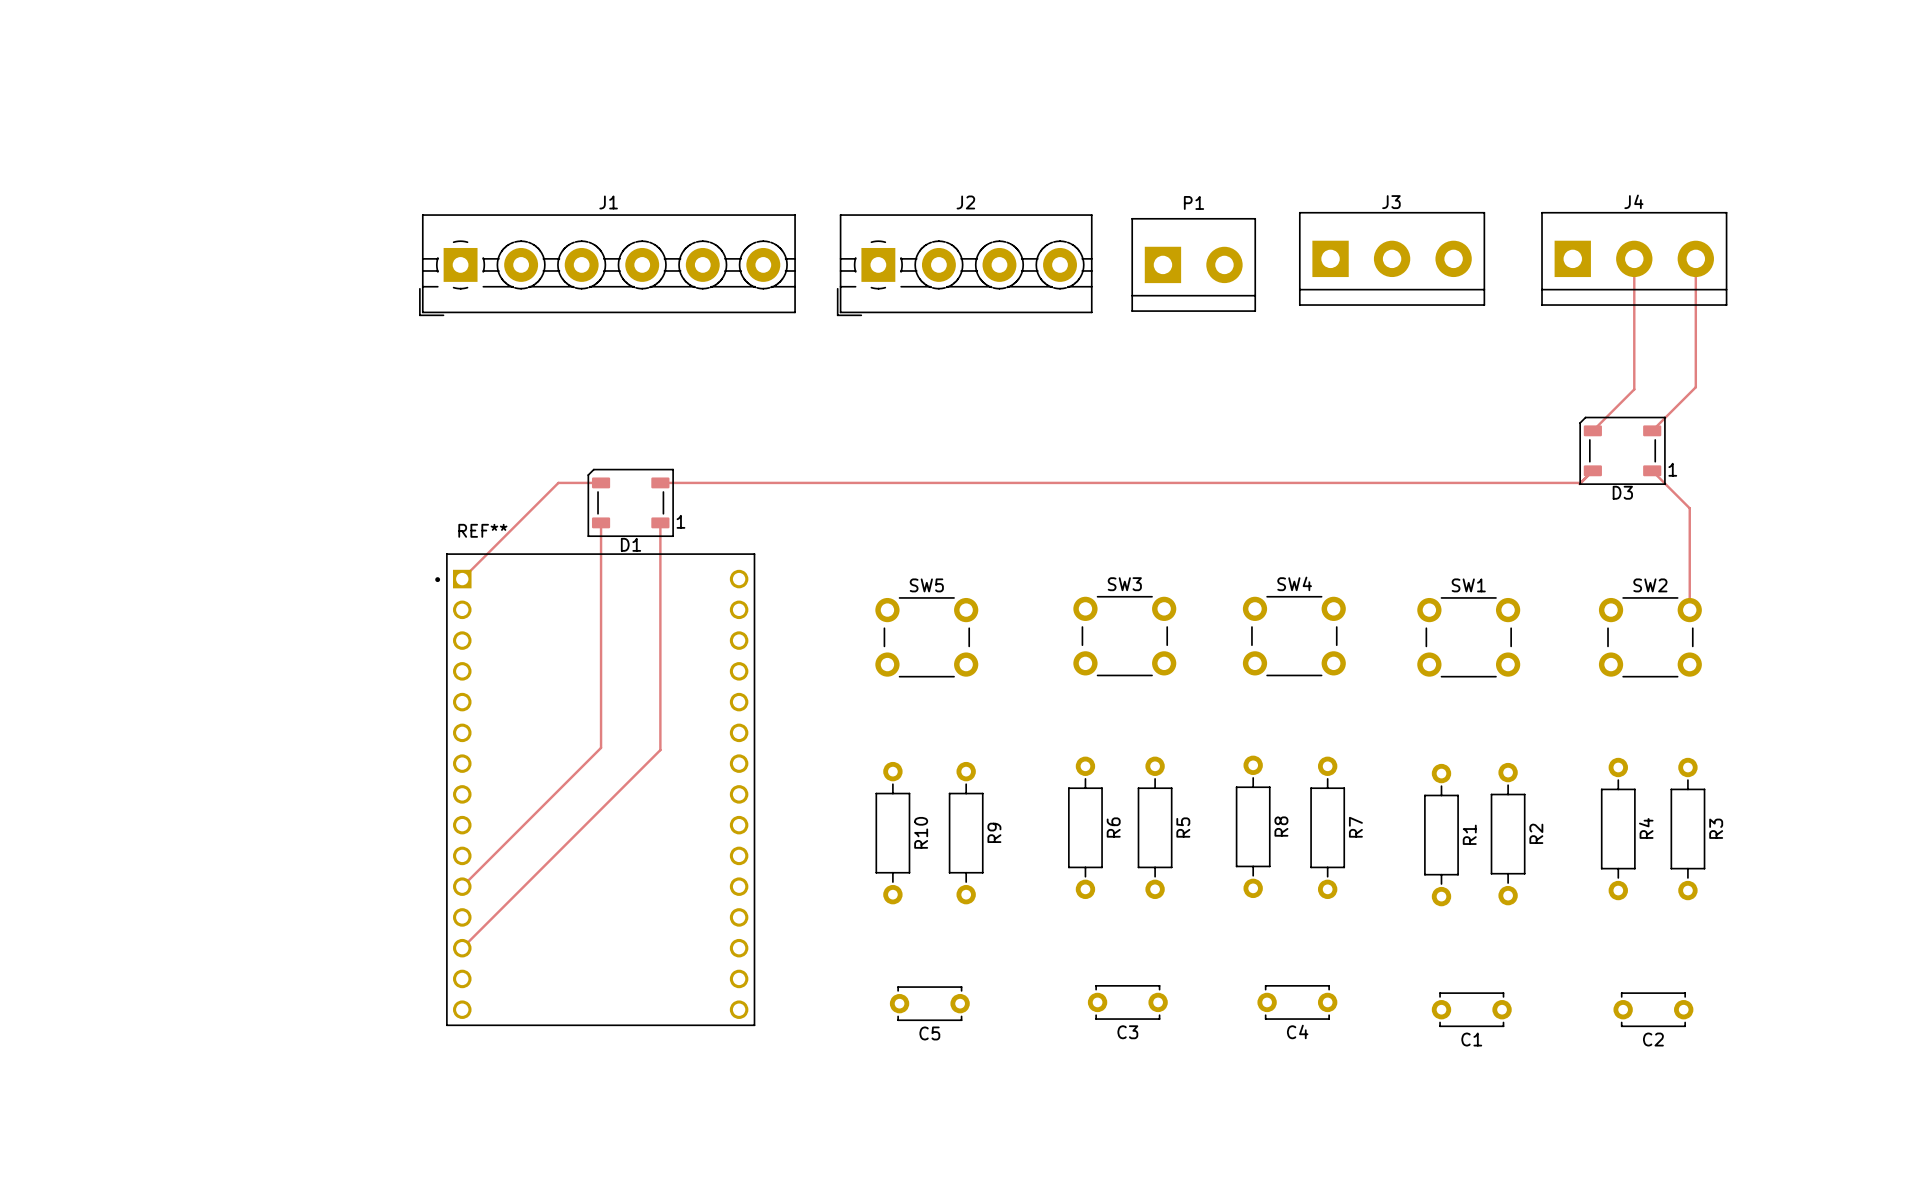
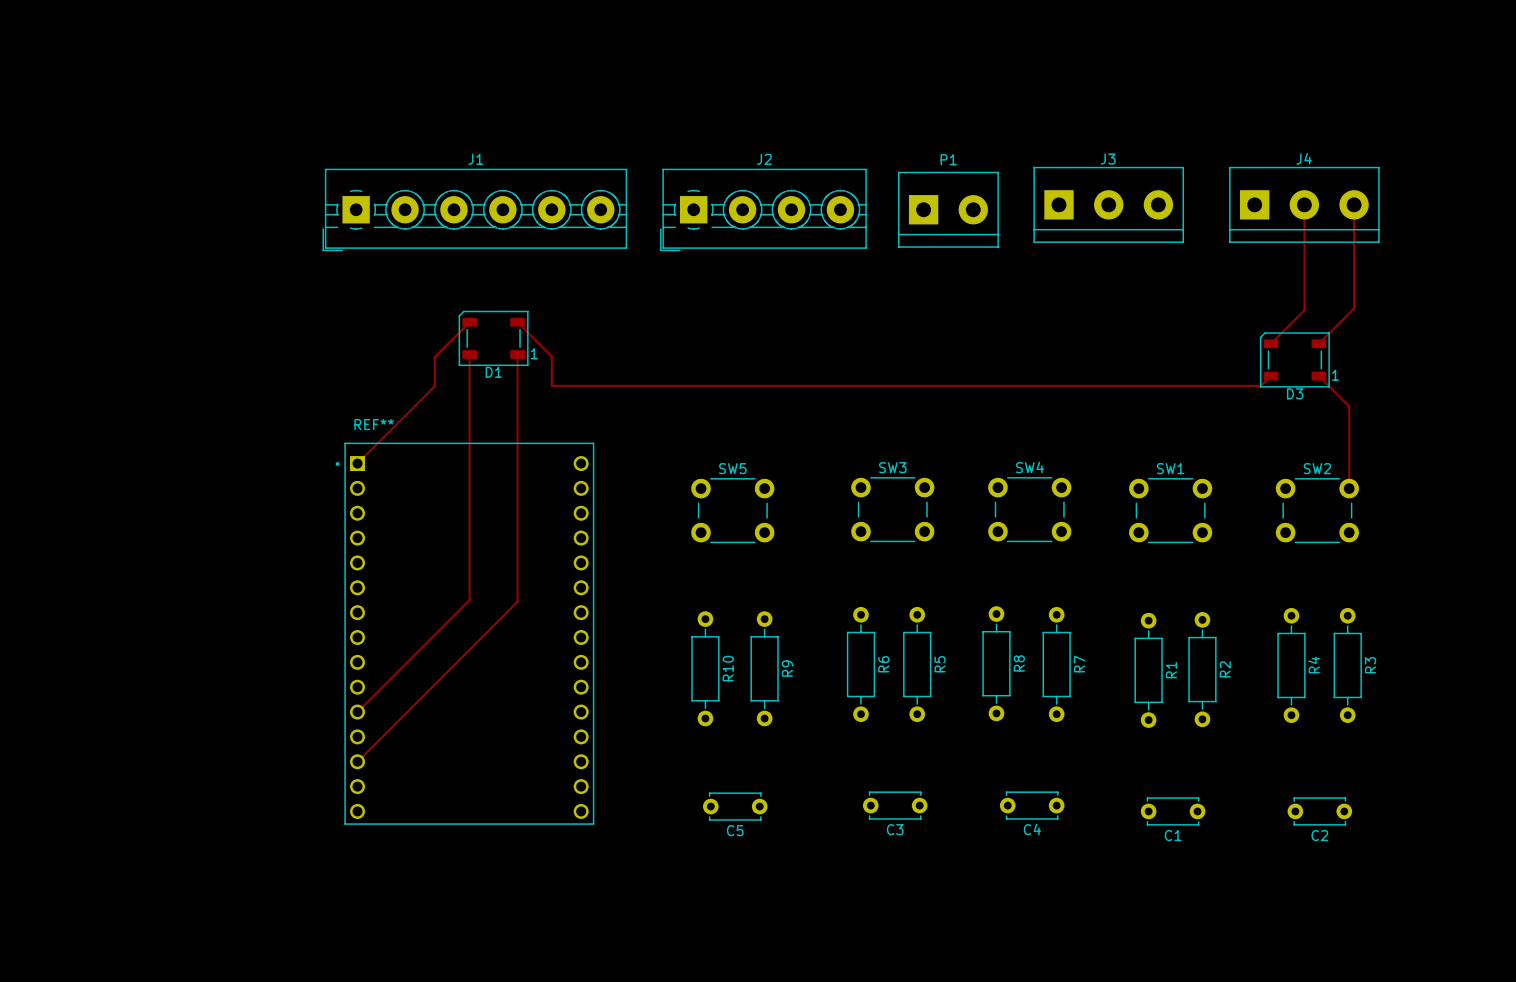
track: none -> (469, 322) (434, 357) (434, 386)
track: none -> (469, 354) (469, 418)
track: none -> (517, 354) (517, 418)
track: (558, 482) (601, 482) -> none
track: (660, 482) (702, 482) -> (517, 322) (551, 356) (551, 385)
D1 position: (630, 502) -> (493, 338)

